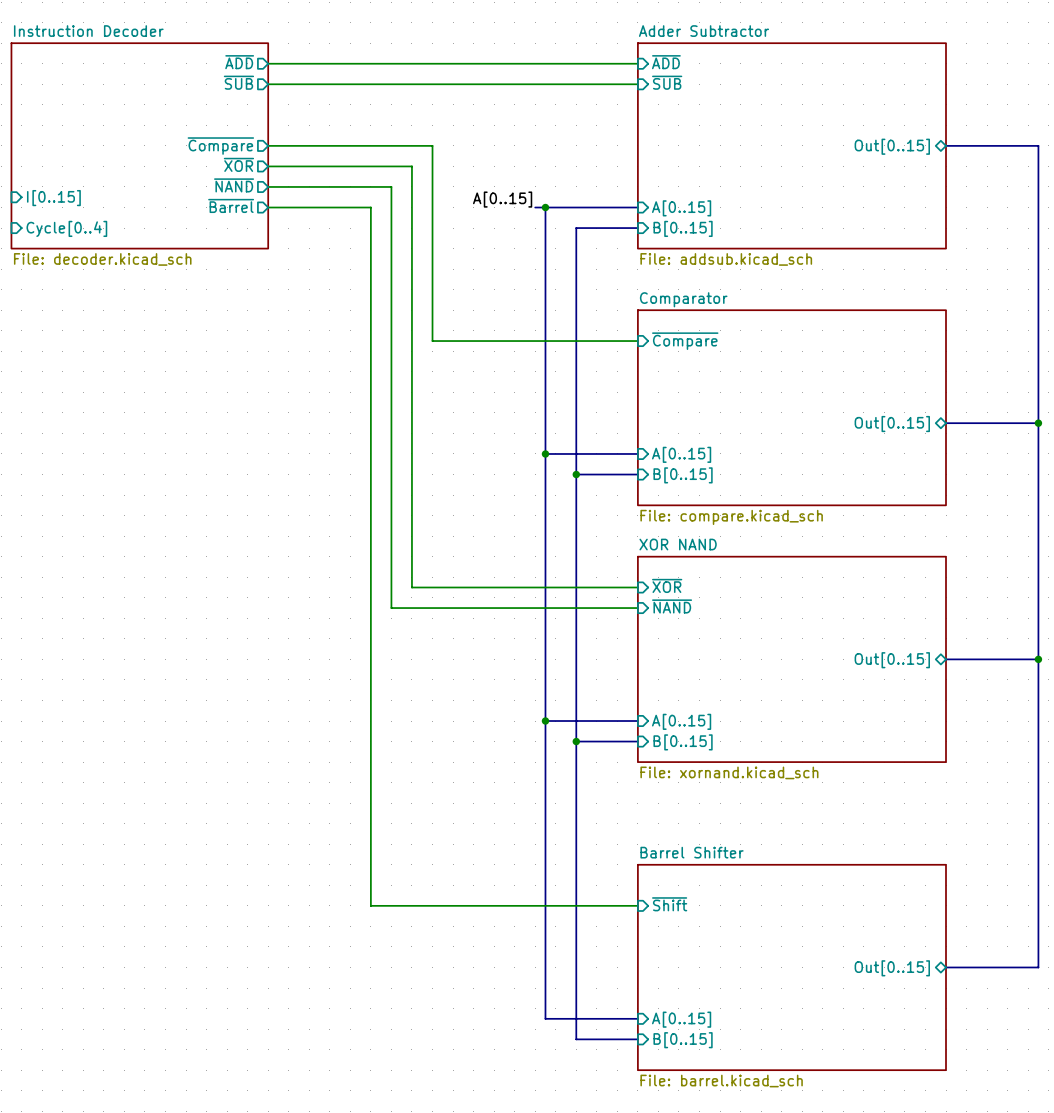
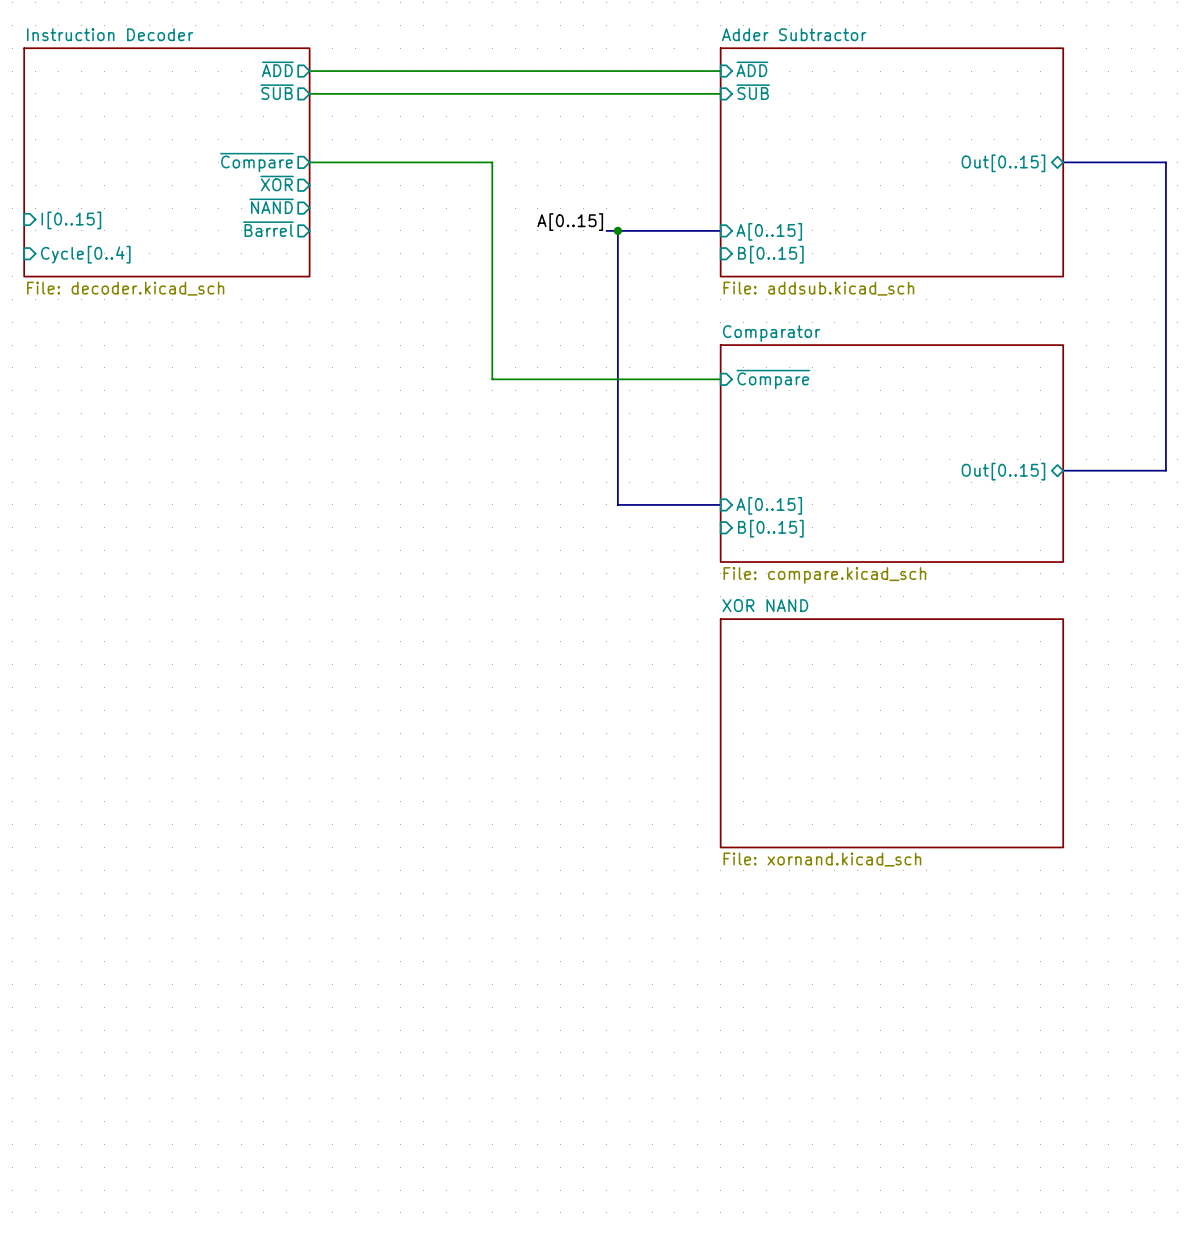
wire: (268, 166) (411, 166) (411, 587) (637, 587) -> none
wire: (268, 186) (391, 186) (391, 608) (637, 608) -> none
wire: (268, 207) (370, 207) (370, 905) (637, 905) -> none
bus: (637, 228) (576, 228) (576, 1039) (637, 1039) -> none
bus: (1038, 423) (1038, 967) (946, 967) -> none
junction: (1038, 423) -> none
bus: (545, 453) (545, 1018) (637, 1018) -> none
junction: (545, 453) -> none
bus: (576, 474) (637, 474) -> none
junction: (576, 474) -> none
sheet pin: ~{XOR} (667, 585) -> none
sheet pin: ~{NAND} (672, 606) -> none
bus: (946, 659) (1038, 659) -> none
junction: (1038, 659) -> none
sheet pin: Out[0..15] (892, 660) -> none
bus: (545, 721) (637, 721) -> none
junction: (545, 721) -> none
sheet pin: A[0..15] (681, 721) -> none
bus: (576, 741) (637, 741) -> none
junction: (576, 741) -> none
sheet pin: B[0..15] (683, 742) -> none
sheet pin: ~{Shift} (669, 904) -> none
sheet Barrel Shifter: File: barrel.kicad_sch (791, 967) -> none
sheet pin: Out[0..15] (892, 968) -> none
sheet pin: A[0..15] (681, 1019) -> none
sheet pin: B[0..15] (683, 1040) -> none

